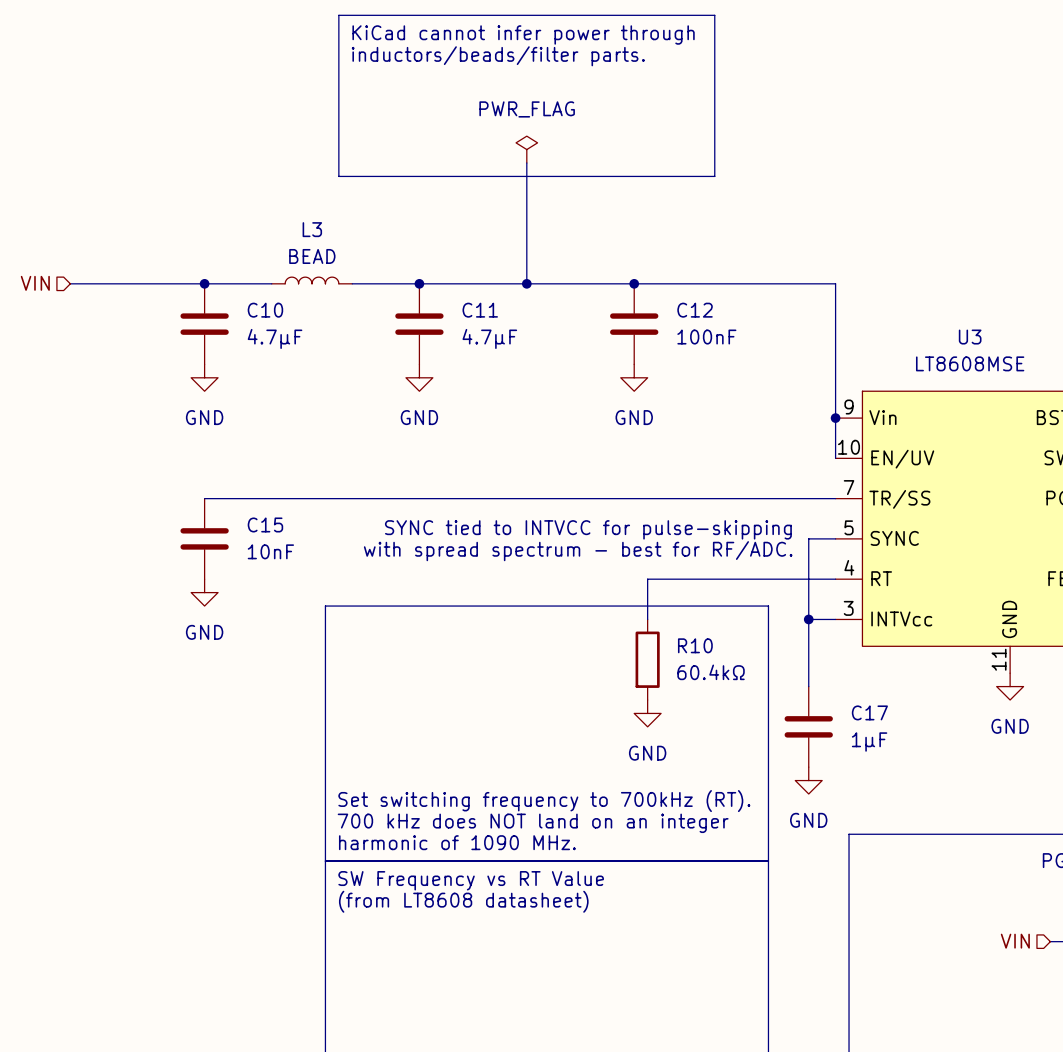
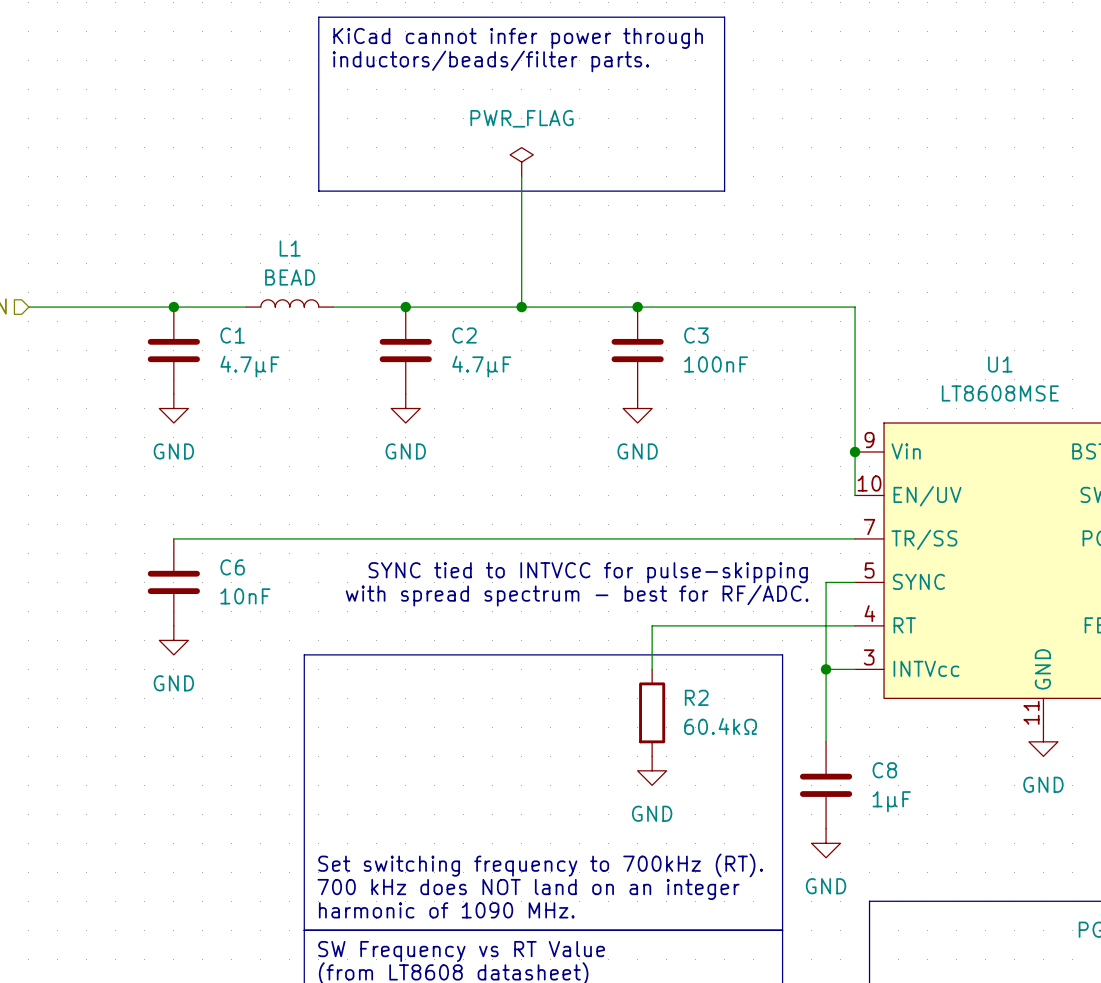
L3 name: L3 (312, 229) -> L1 (290, 248)
C10 name: C10 (265, 310) -> C1 (232, 335)
C11 name: C11 (480, 310) -> C2 (464, 335)
C12 name: C12 (695, 310) -> C3 (696, 335)
U3 name: U3 (970, 337) -> U1 (1000, 364)
C15 name: C15 (265, 524) -> C6 (232, 567)
R10 name: R10 (695, 645) -> R2 (696, 697)
C17 name: C17 (869, 712) -> C8 (884, 770)

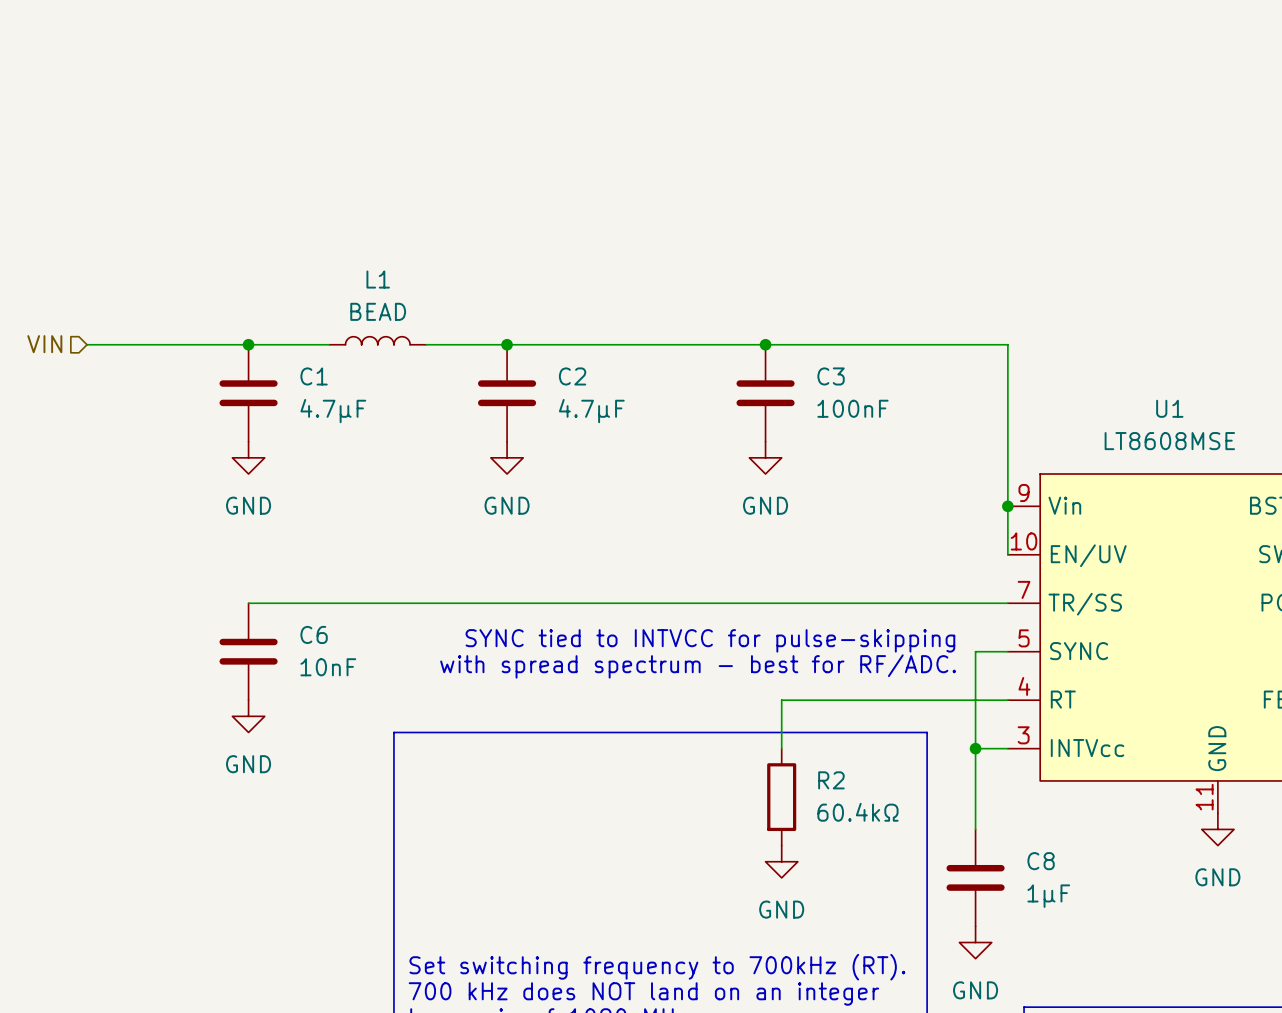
line: (318, 17) (724, 17) (724, 191) (318, 191) (318, 17) -> none
text: KiCad cannot infer power through (518, 38) -> none
text: inductors/beads/filter parts. (490, 61) -> none
power symbol: PWR_FLAG (521, 162) -> none
wire: (521, 176) (521, 307) -> none
junction: (521, 307) -> none

